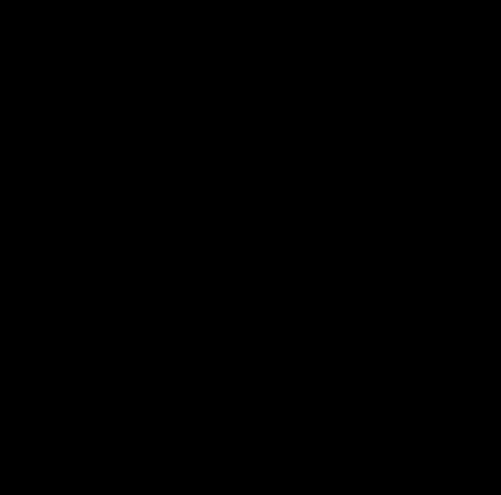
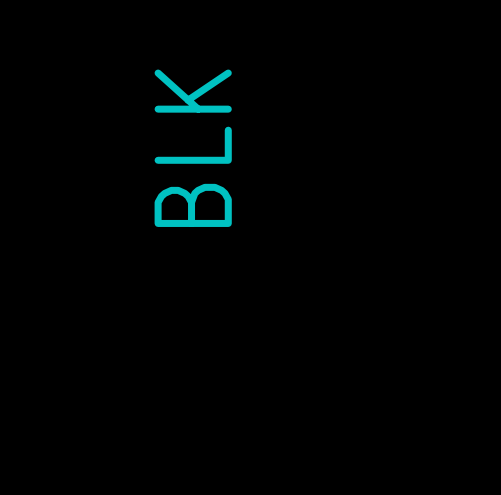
text: none -> BLK (193, 148)

